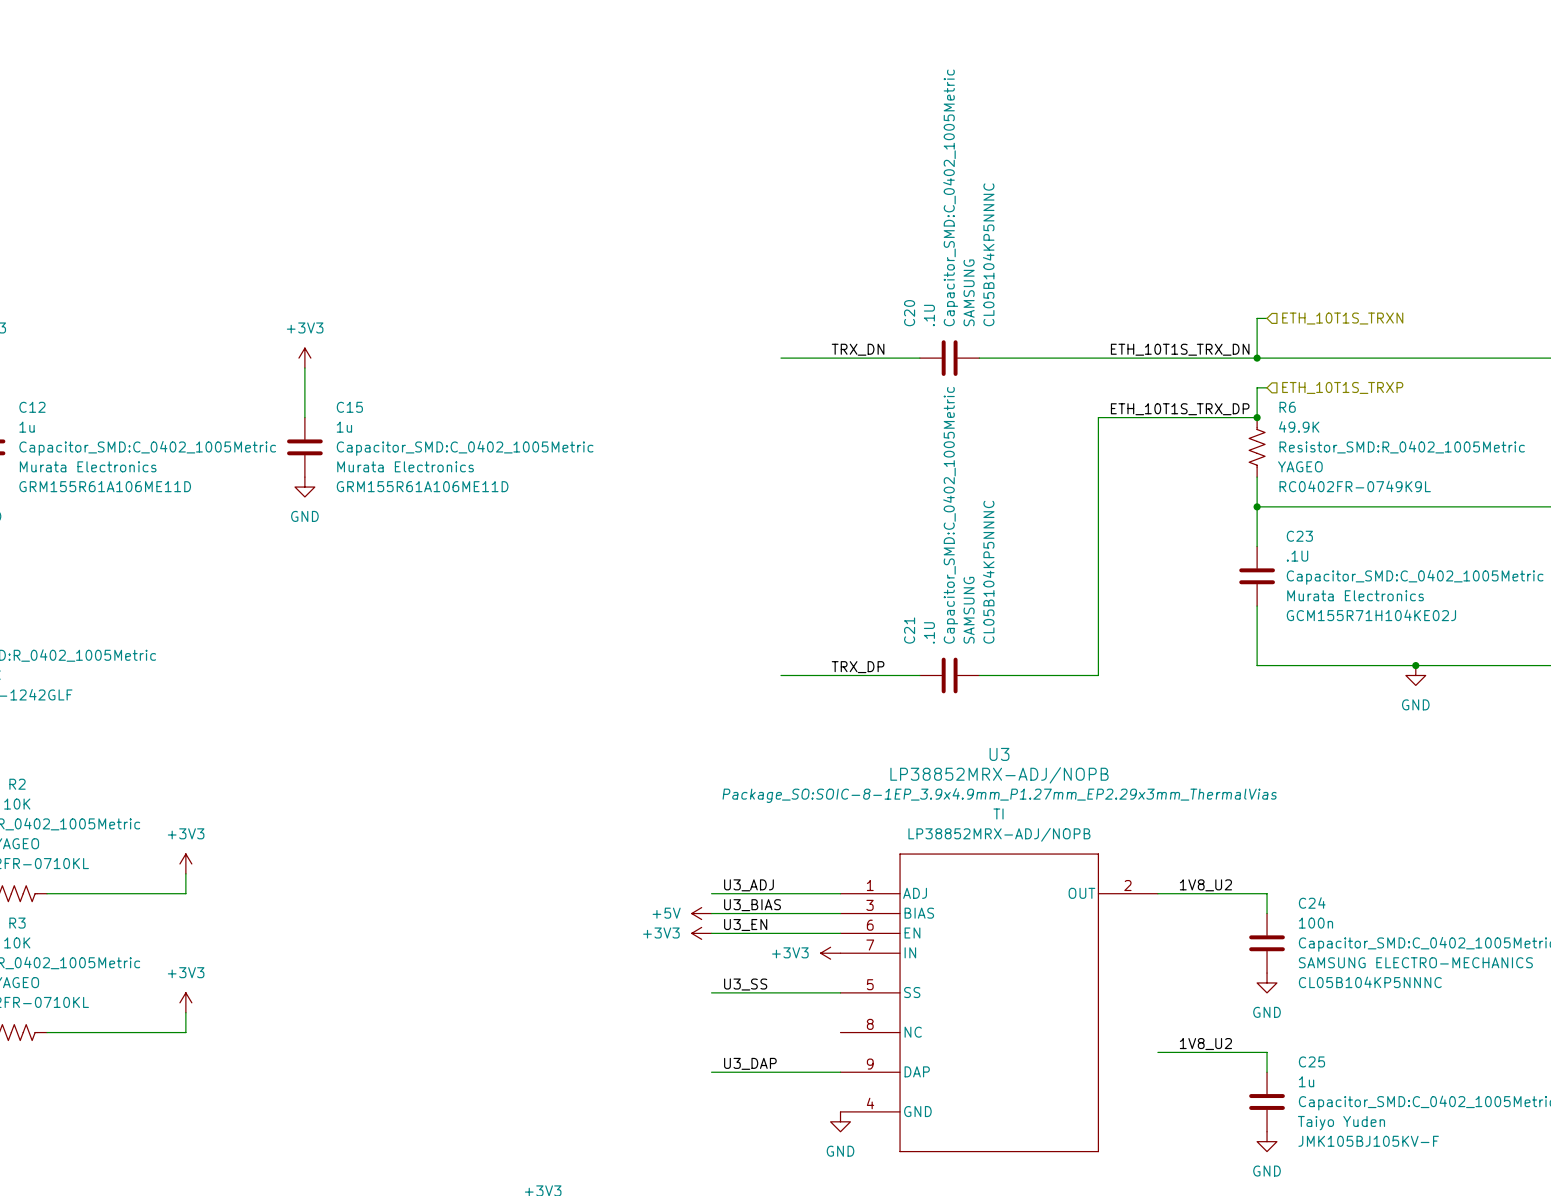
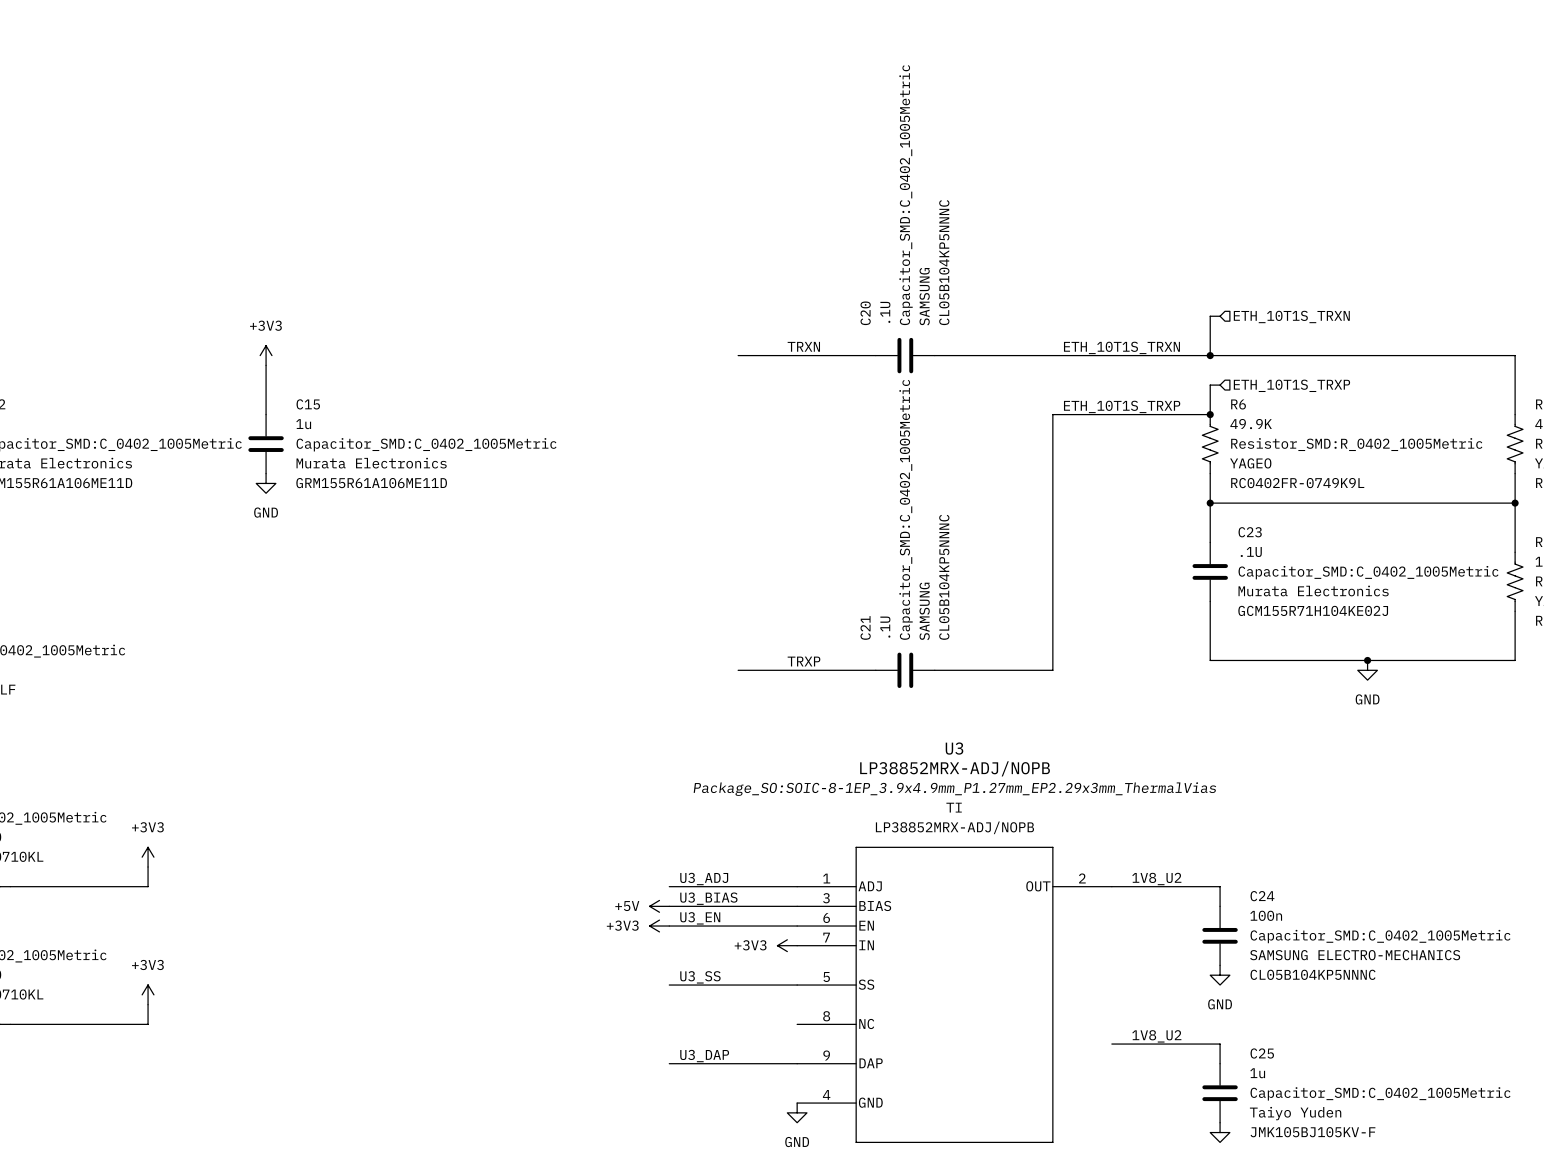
label: TRX_DN (858, 349) -> TRXN (803, 346)
label: ETH_10T1S_TRX_DN (1180, 349) -> ETH_10T1S_TRXN (1121, 347)
label: ETH_10T1S_TRX_DP (1180, 409) -> ETH_10T1S_TRXP (1122, 406)
label: TRX_DP (858, 667) -> TRXP (804, 661)

